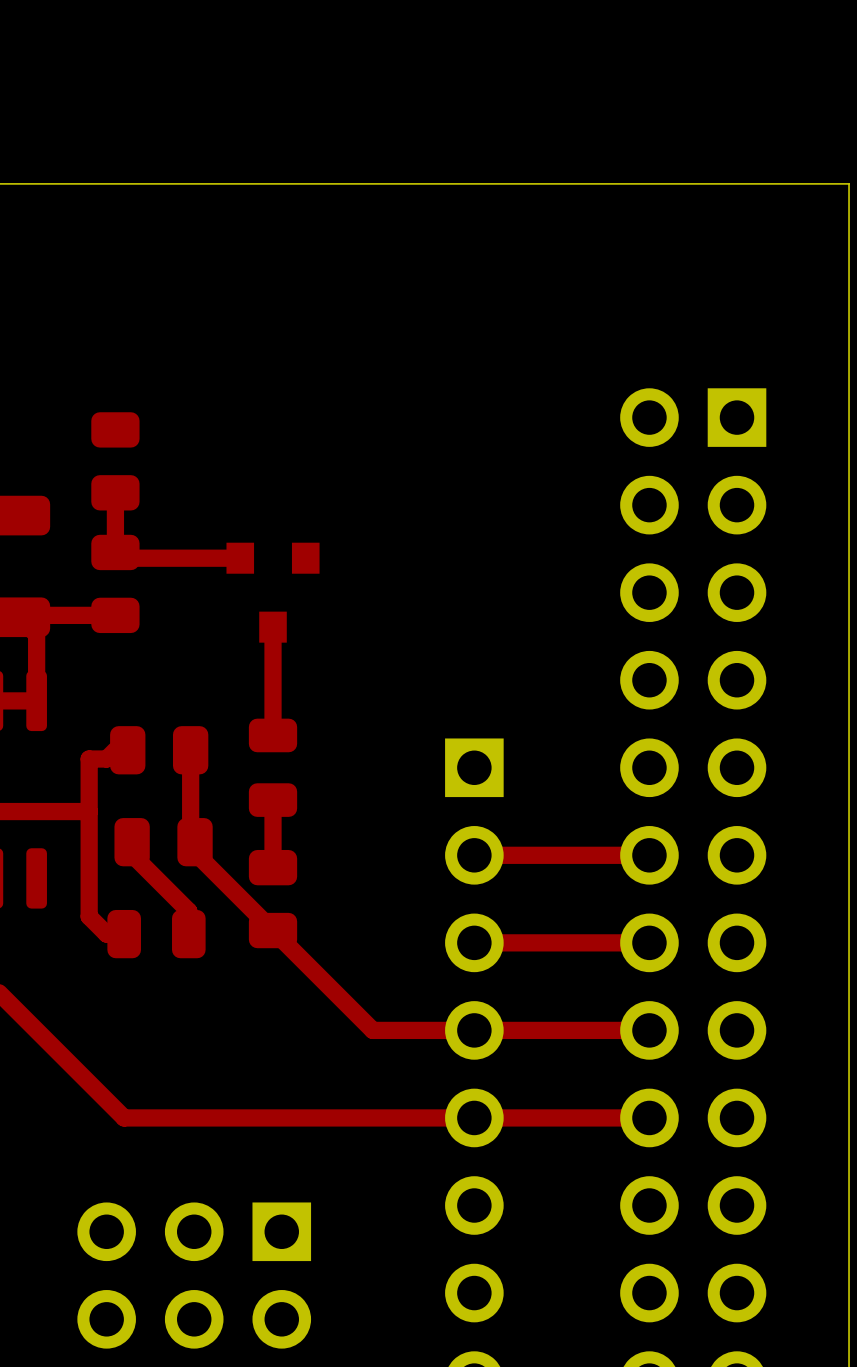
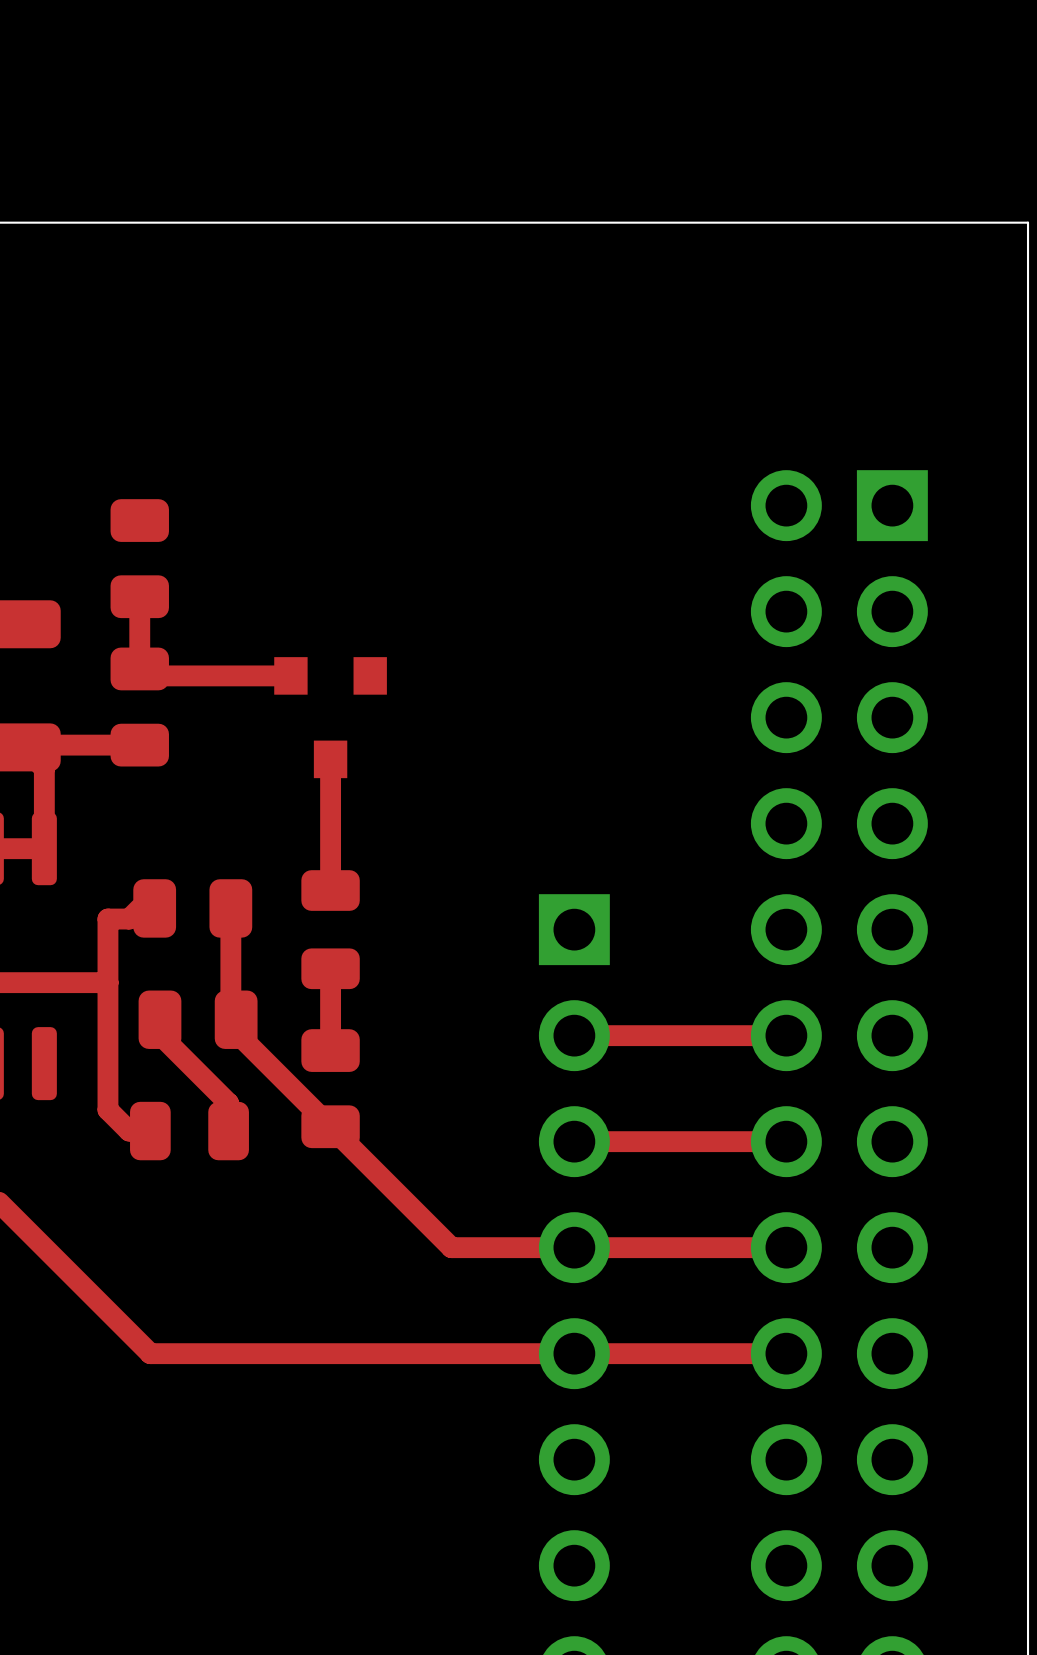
part: (194, 1275) -> none

